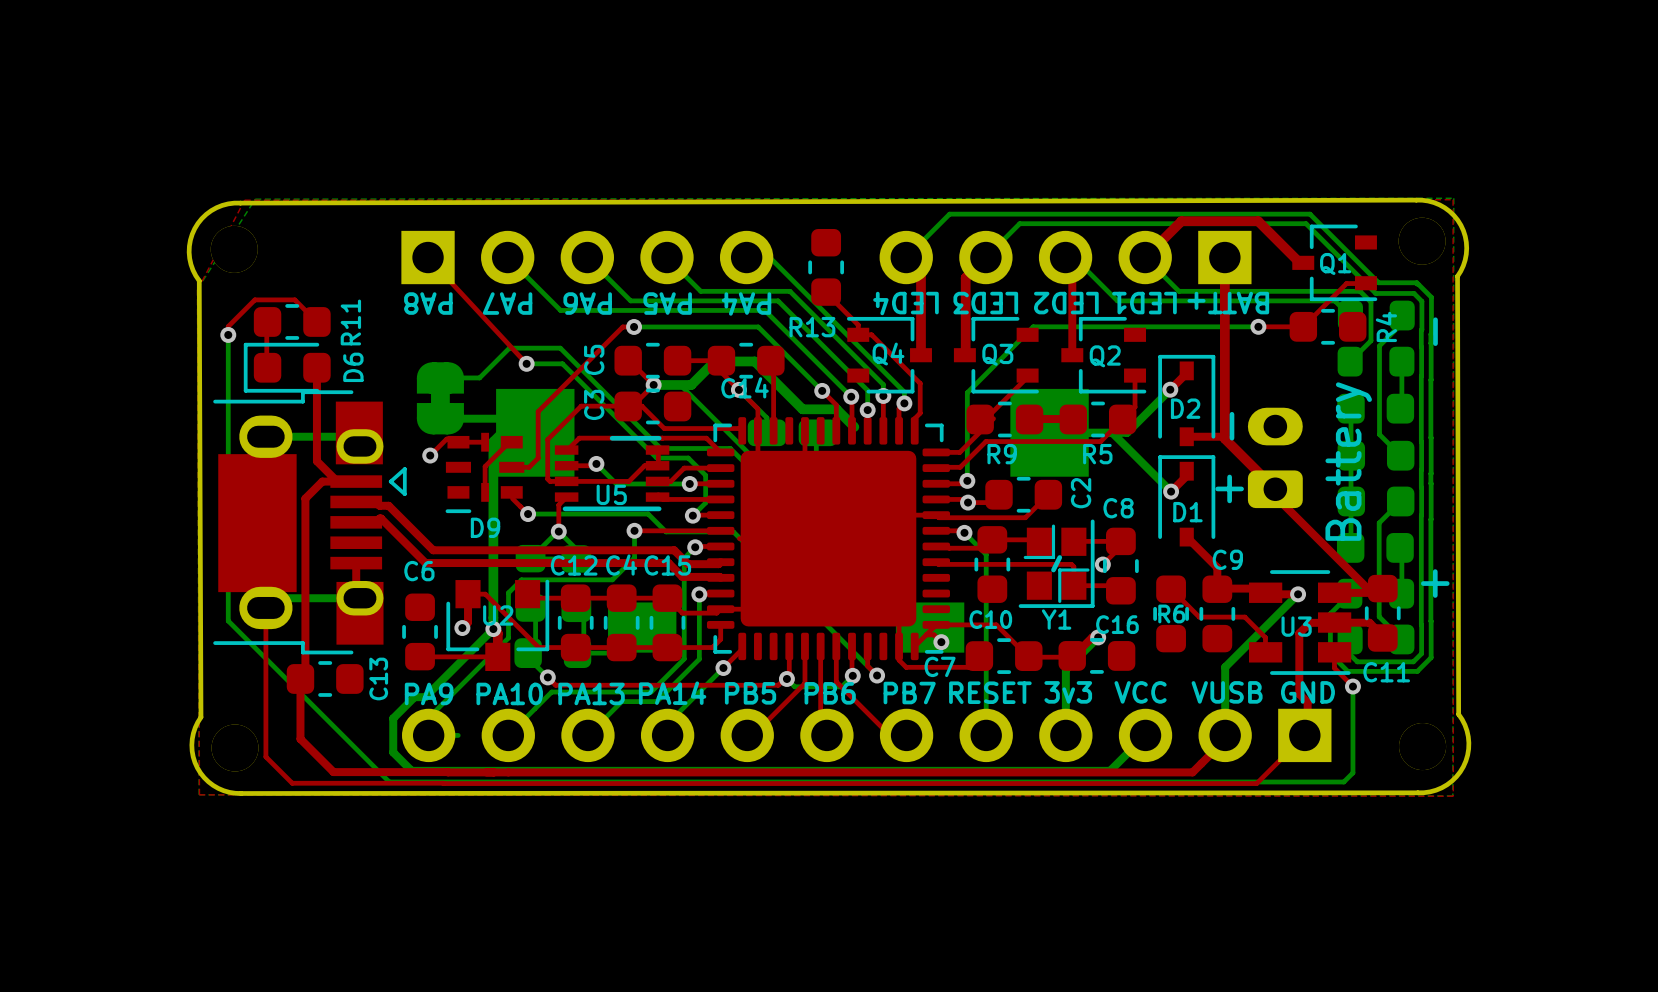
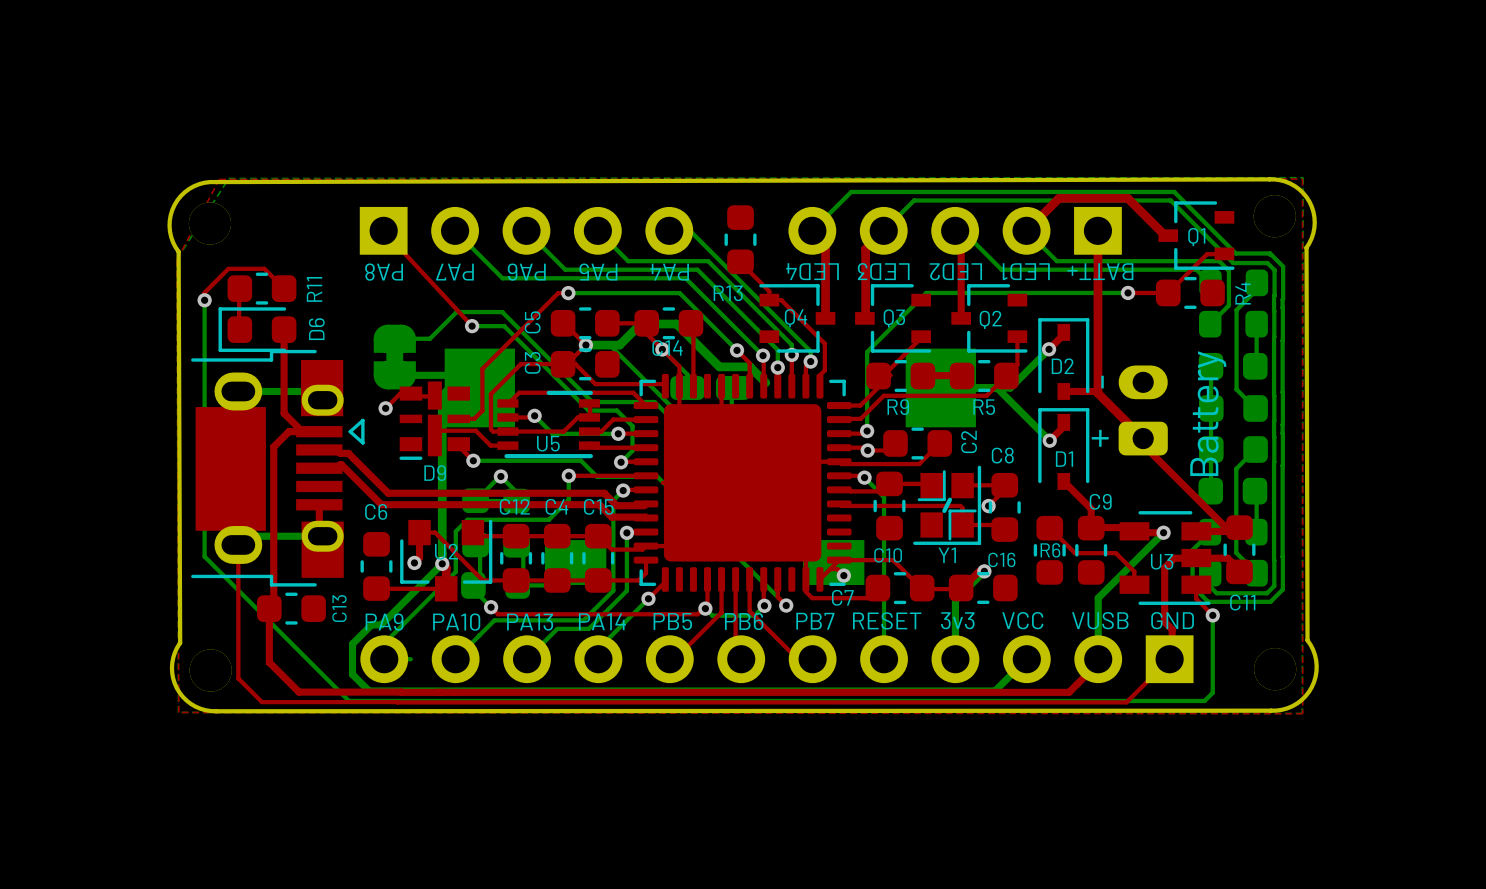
text: - (1435, 331) -> none
D9 footprint: [445, 432, 525, 514] -> [399, 381, 470, 460]
top track: (511, 442) (509, 442) (485, 466) (485, 492) -> none
top track: (566, 497) (558, 504) (558, 531) -> (508, 445) (490, 445) (475, 430) (440, 430) (435, 435)
text: + (1435, 583) -> none

